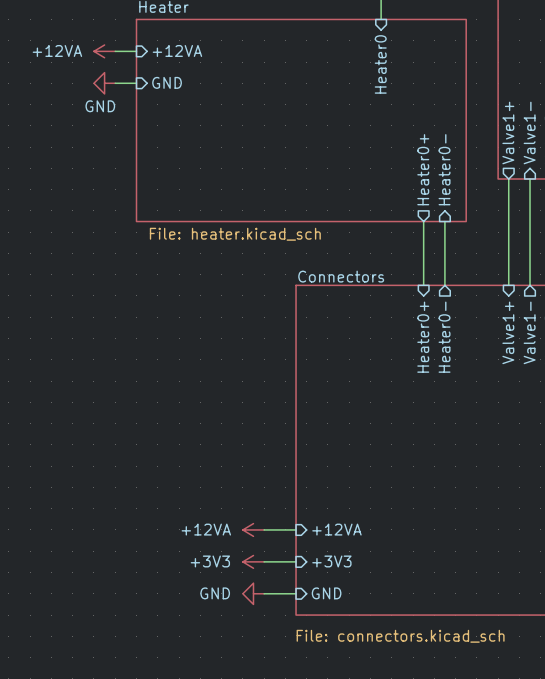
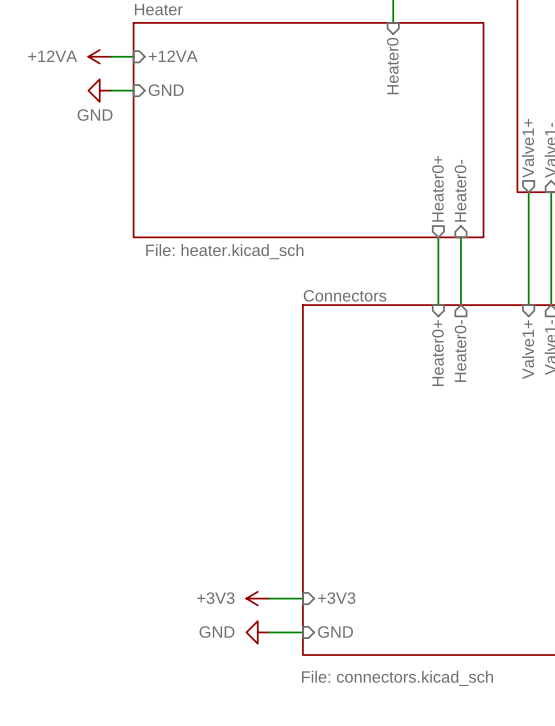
power symbol: +12VA (253, 529) -> none
wire: (264, 529) (296, 529) -> none
sheet pin: +12VA (336, 529) -> none

